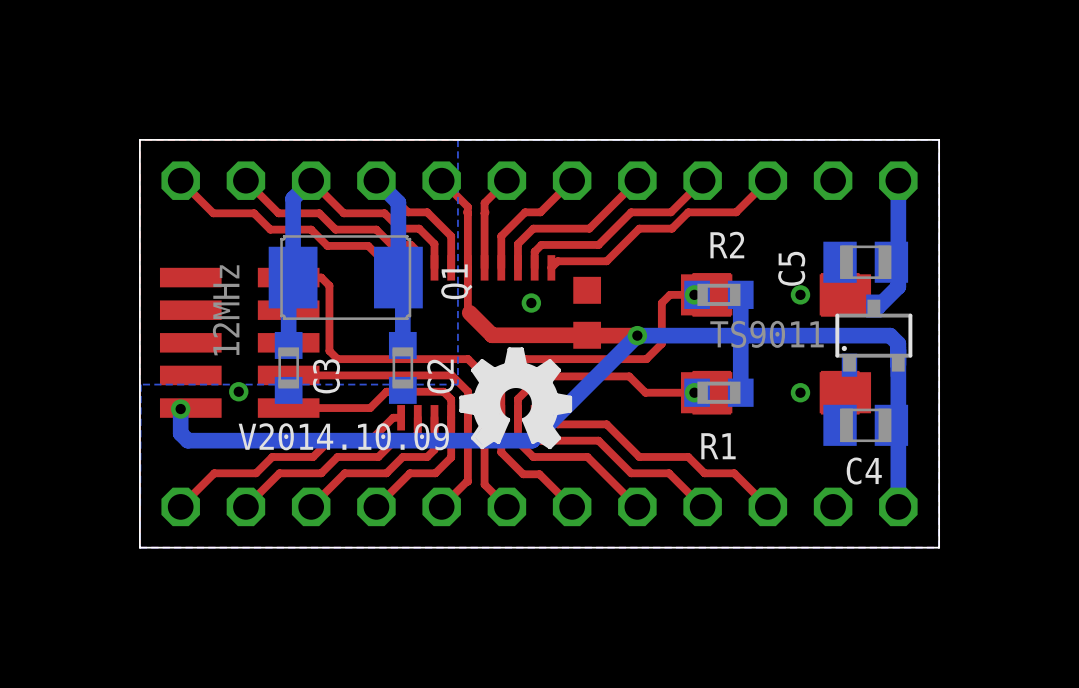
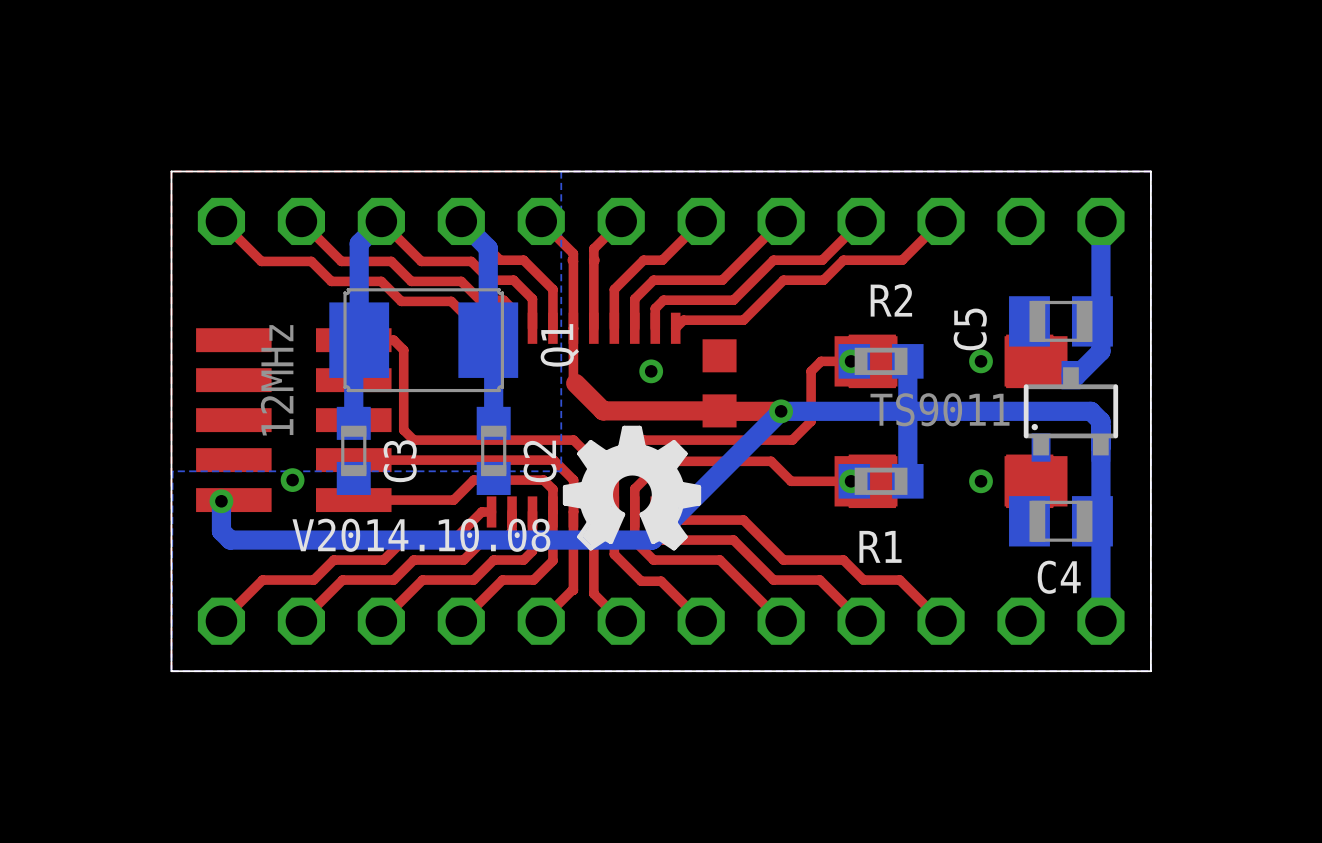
text: V2014.10.09 (343, 436) -> V2014.10.08 (421, 535)

